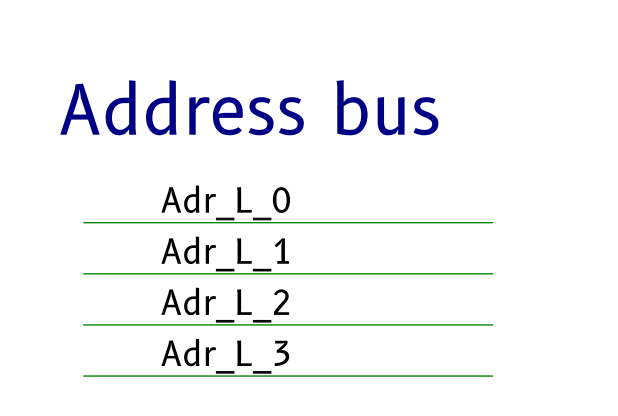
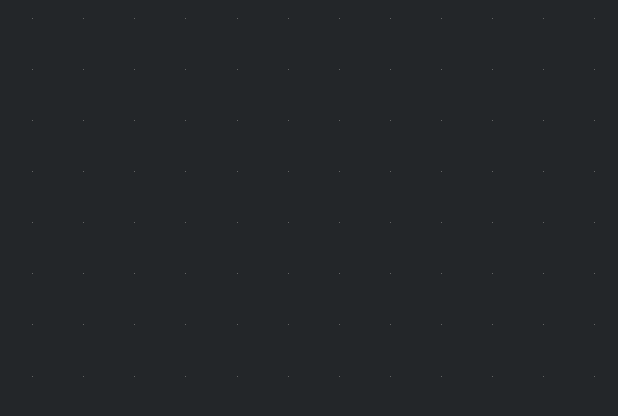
text: Address bus (249, 107) -> none
label: Adr_L_0 (225, 202) -> none
wire: (83, 222) (492, 222) -> none
label: Adr_L_1 (225, 253) -> none
wire: (83, 273) (492, 273) -> none
label: Adr_L_2 (225, 305) -> none
wire: (83, 324) (492, 324) -> none
label: Adr_L_3 (225, 356) -> none
wire: (83, 376) (492, 376) -> none

